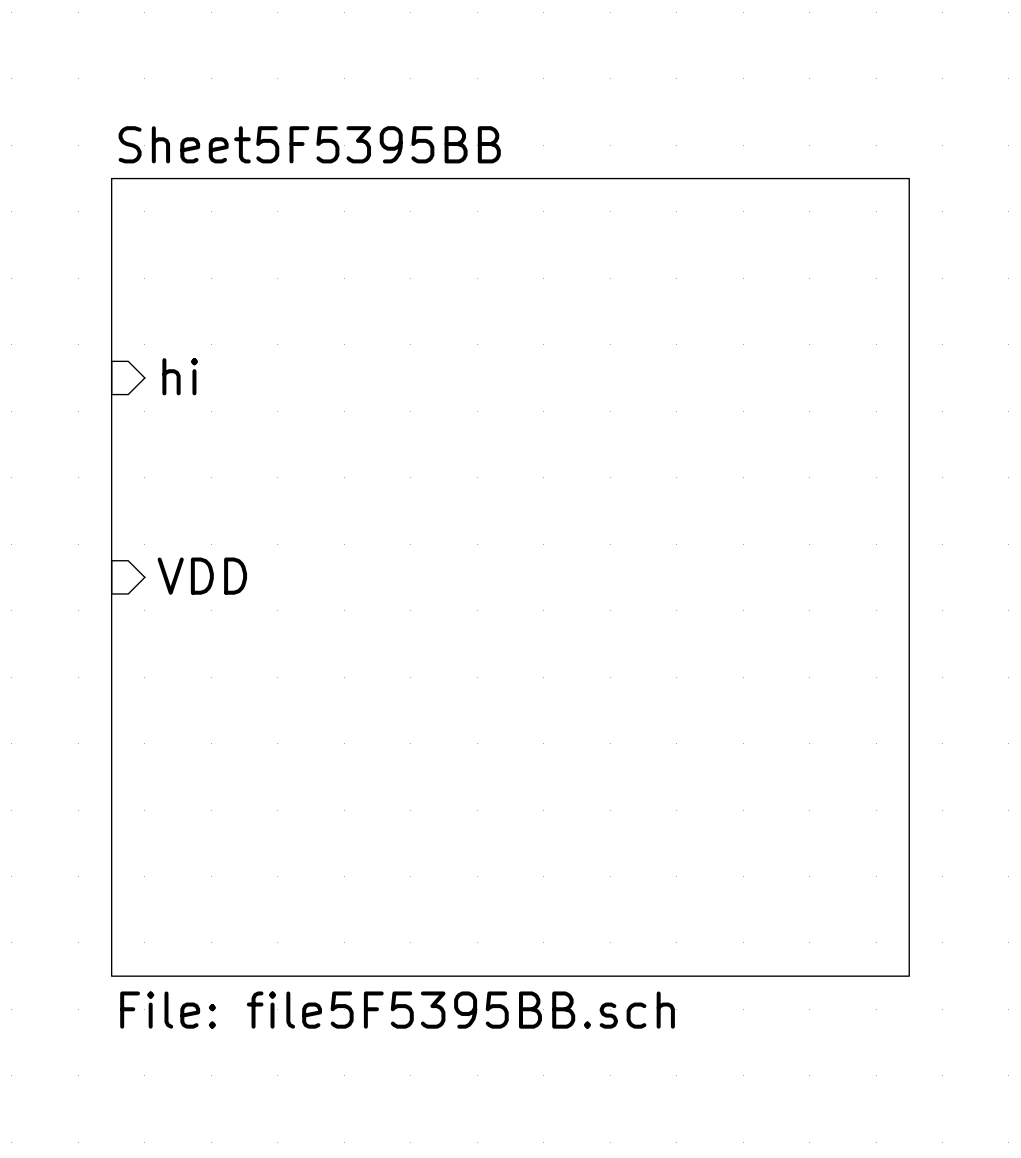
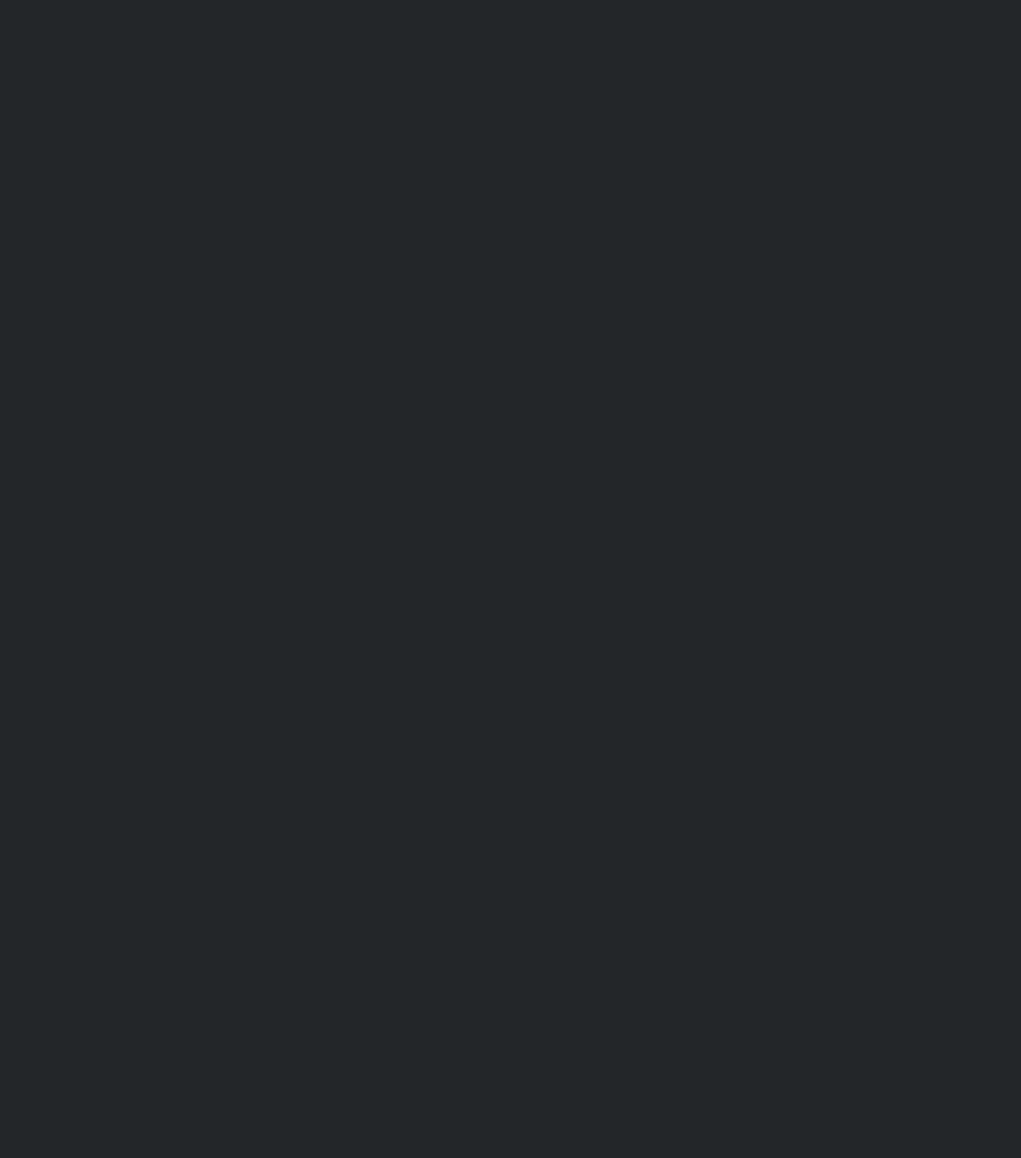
sheet pin: hi (180, 376) -> none
sheet pin: VDD (202, 576) -> none
sheet Sheet5F5395BB: File: file5F5395BB.sch (510, 577) -> none

